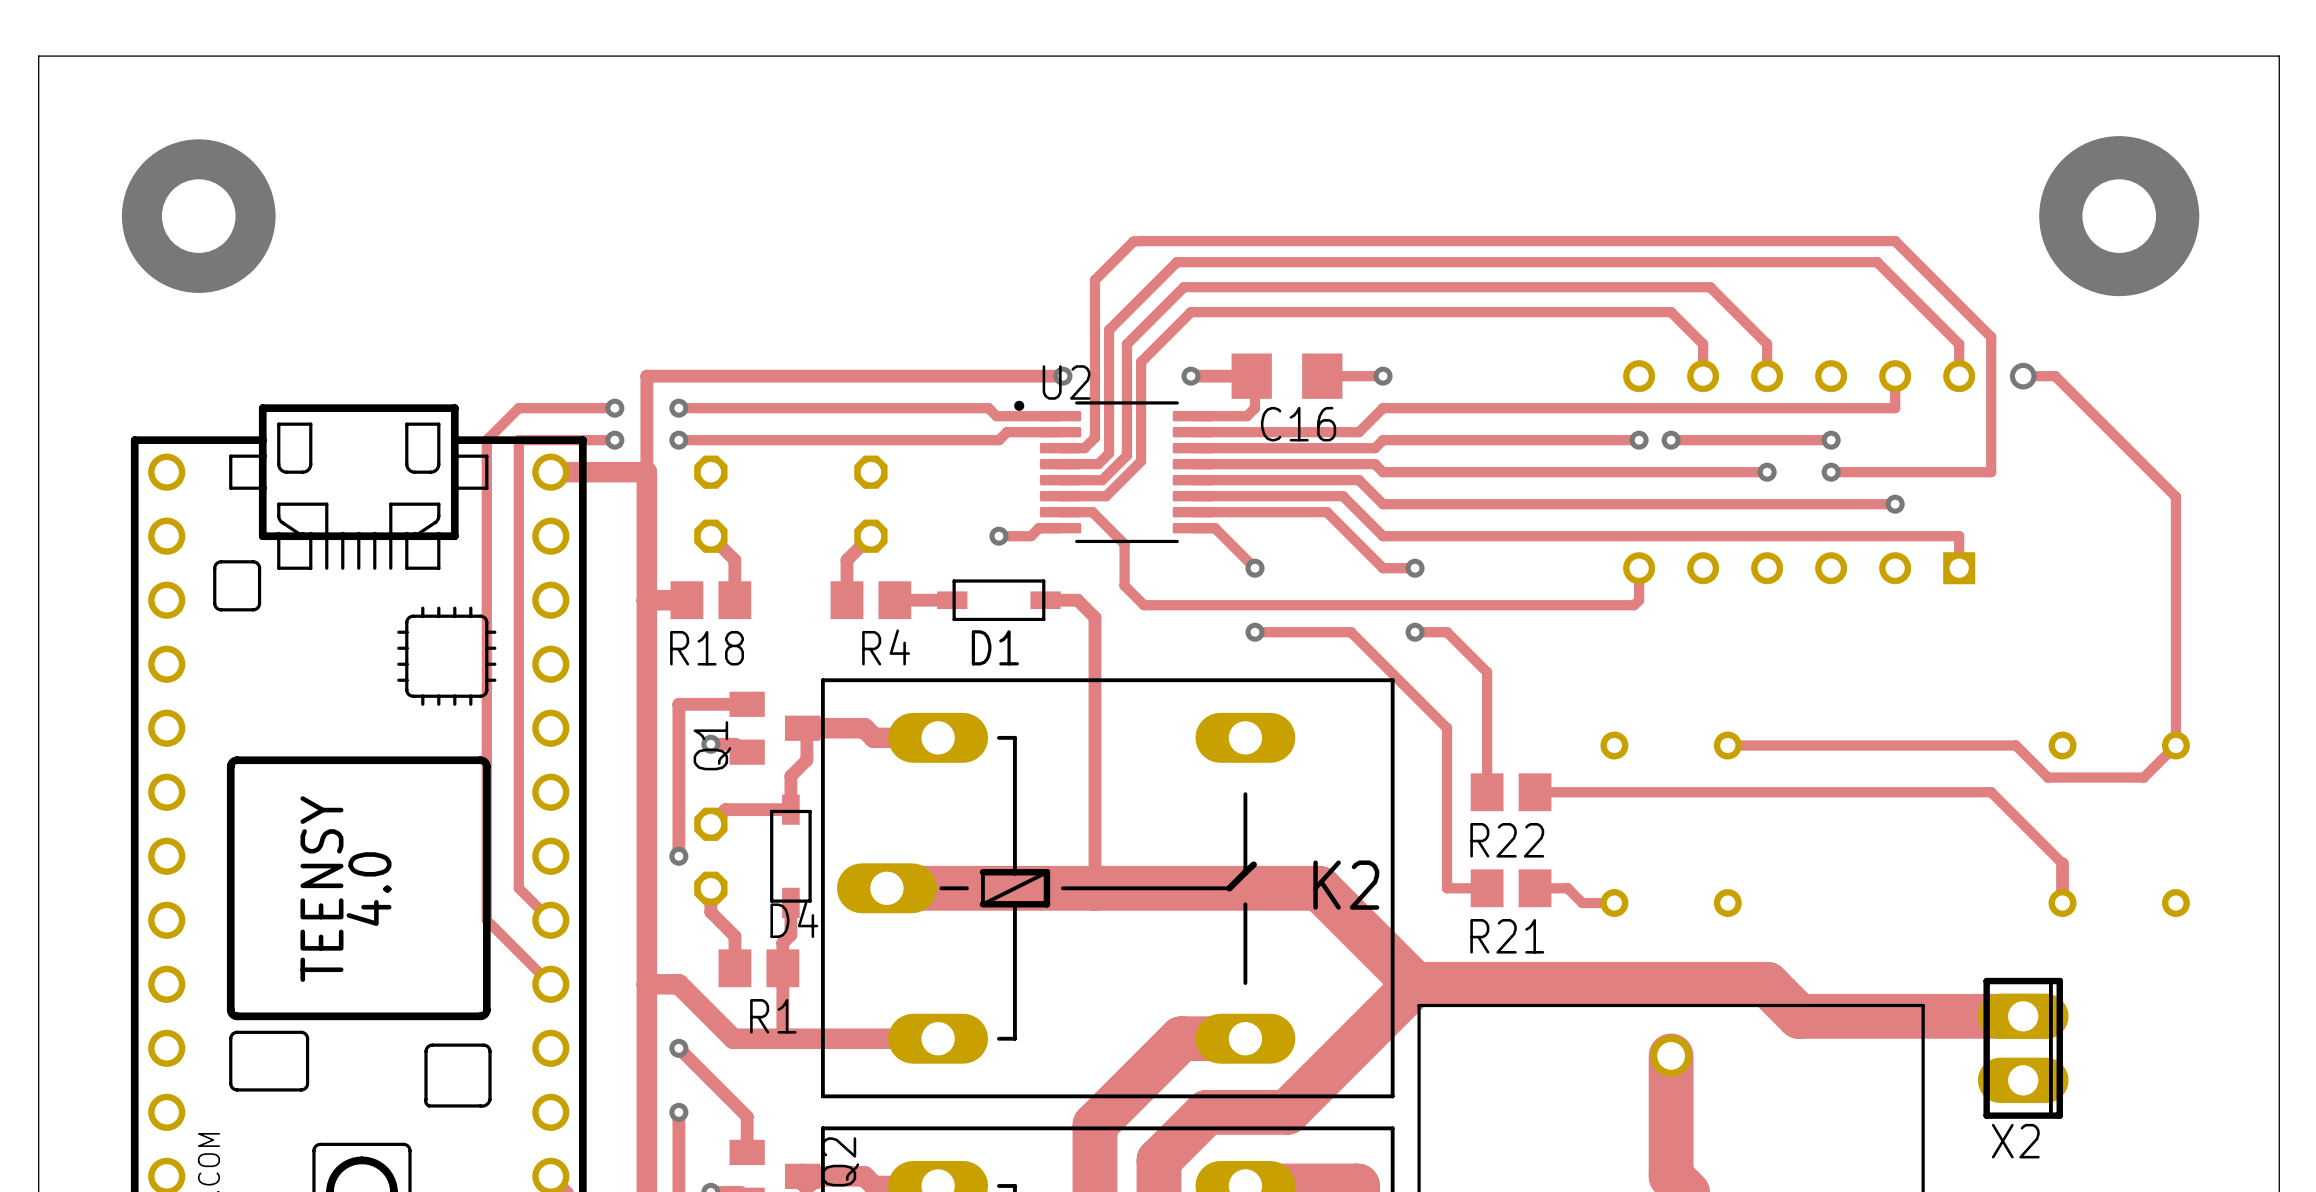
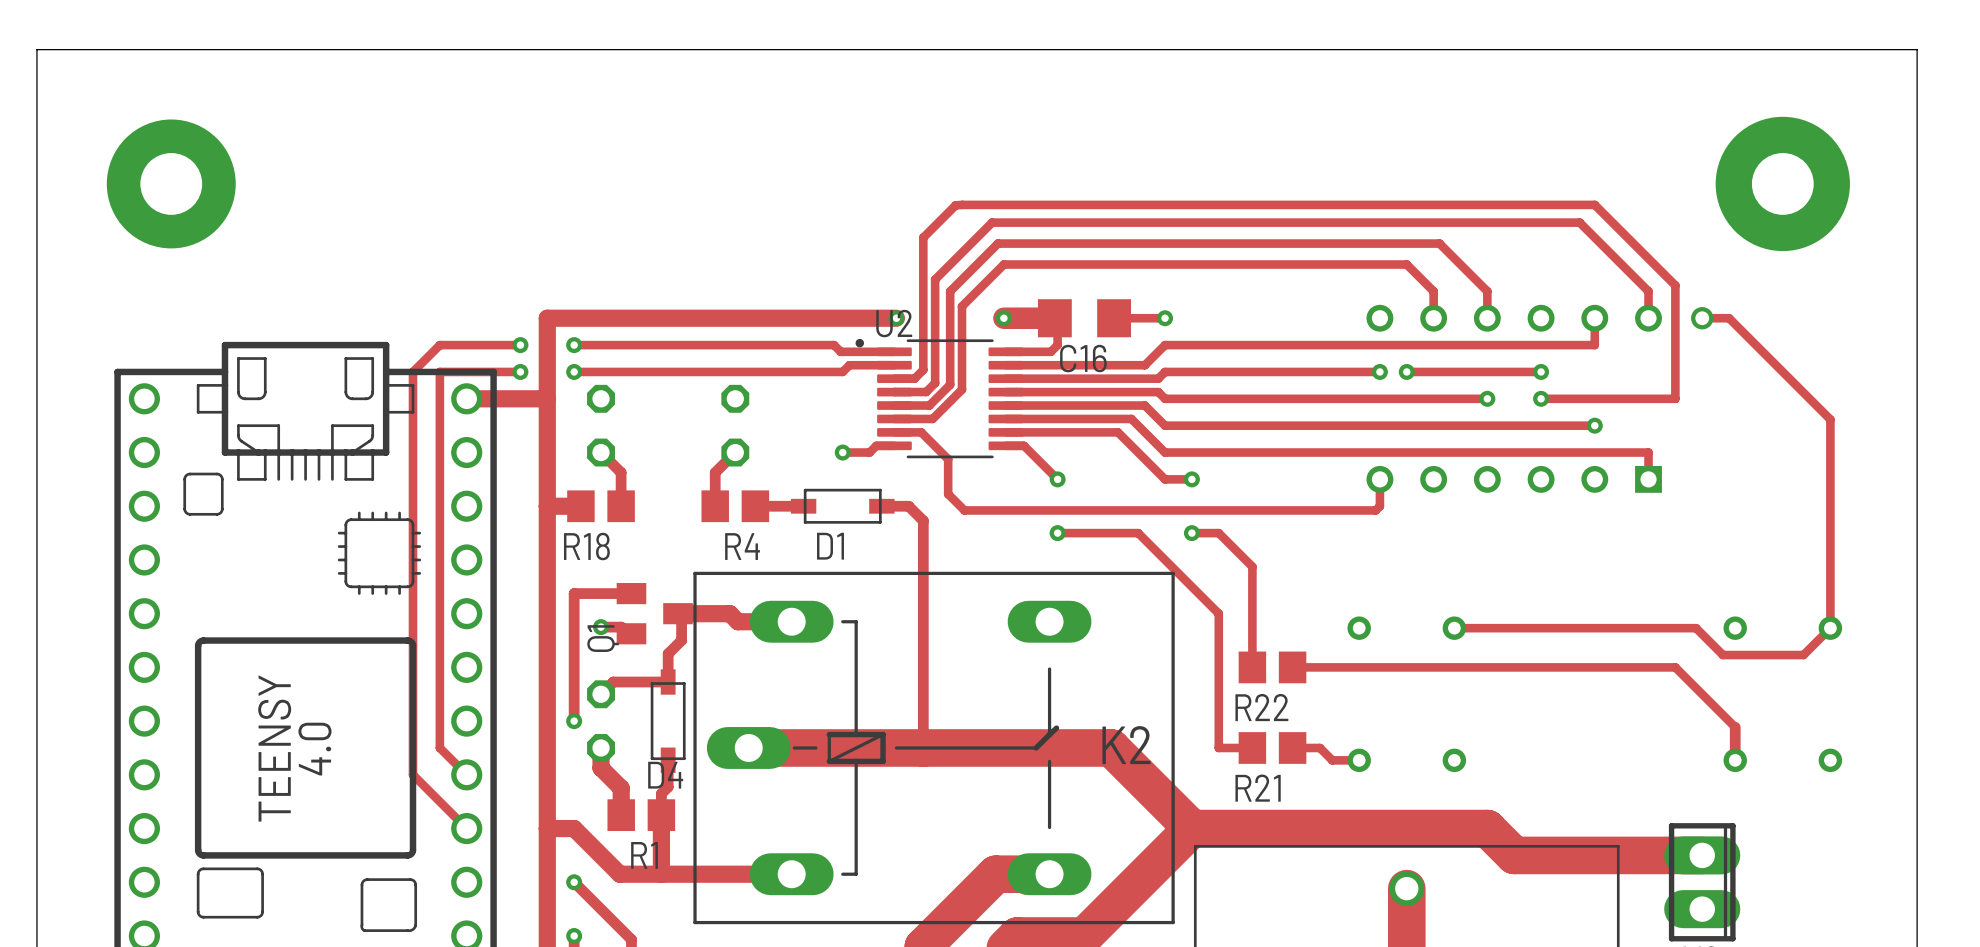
track width: thin (1062, 376) (646, 376) (646, 472) -> thick (896, 318) (547, 318) (547, 398)
track width: thin (1190, 376) (1251, 376) -> thick (1003, 318) (1054, 318)
track width: thin (710, 888) (710, 912) (734, 936) (734, 968) -> thick (601, 747) (601, 768) (621, 788) (621, 815)
track width: thin (782, 968) (782, 1038) -> thick (661, 815) (661, 874)

